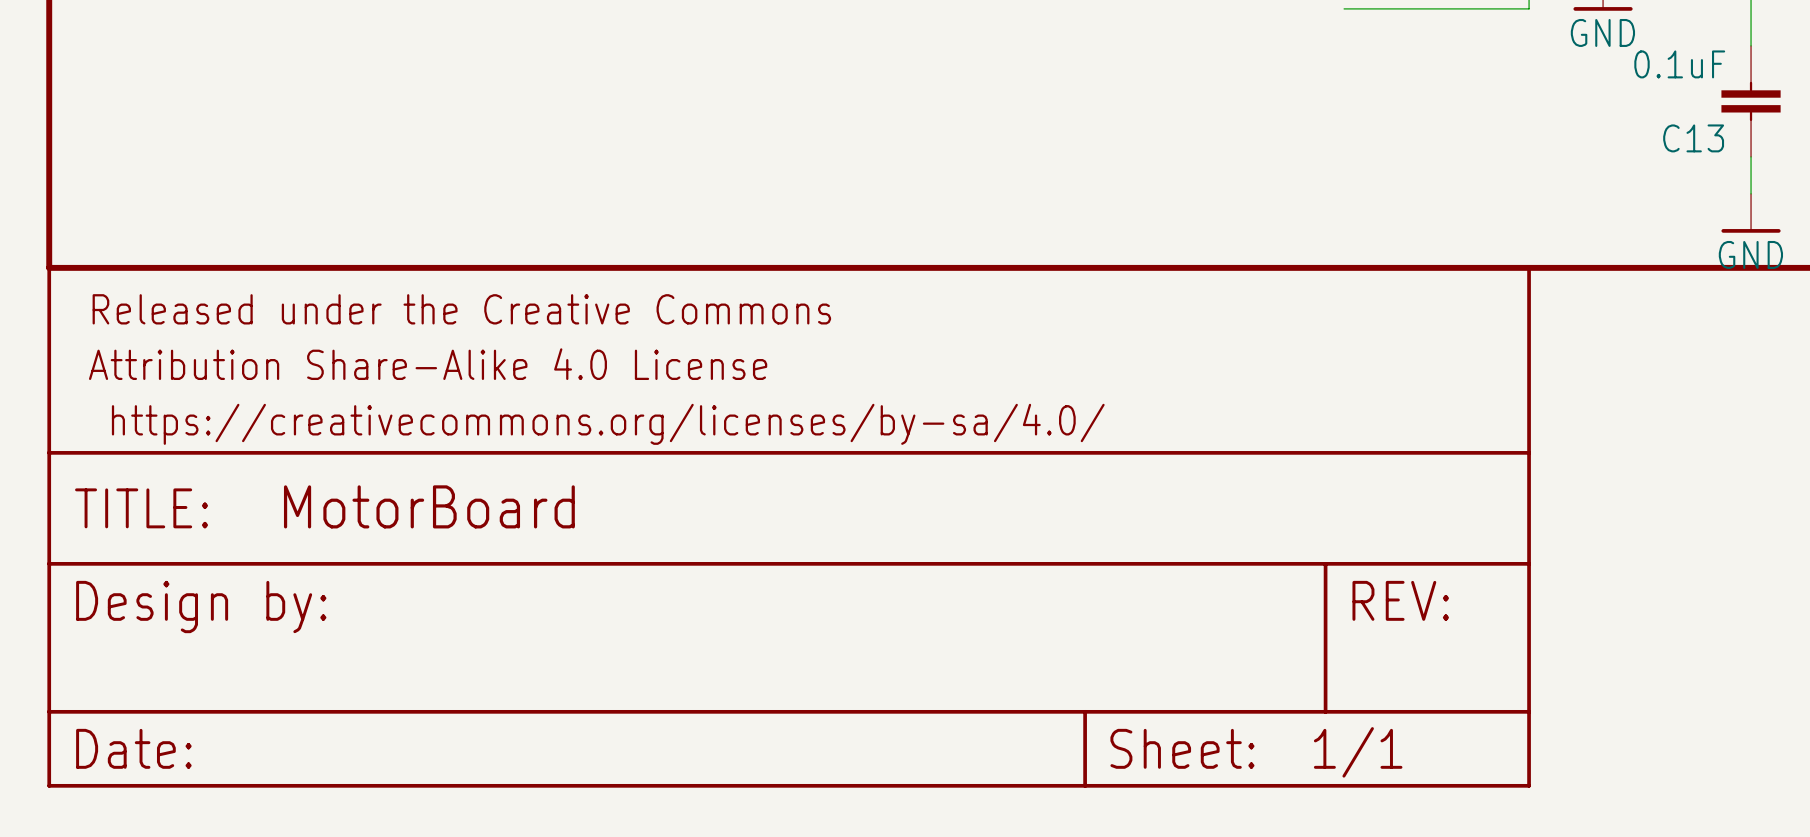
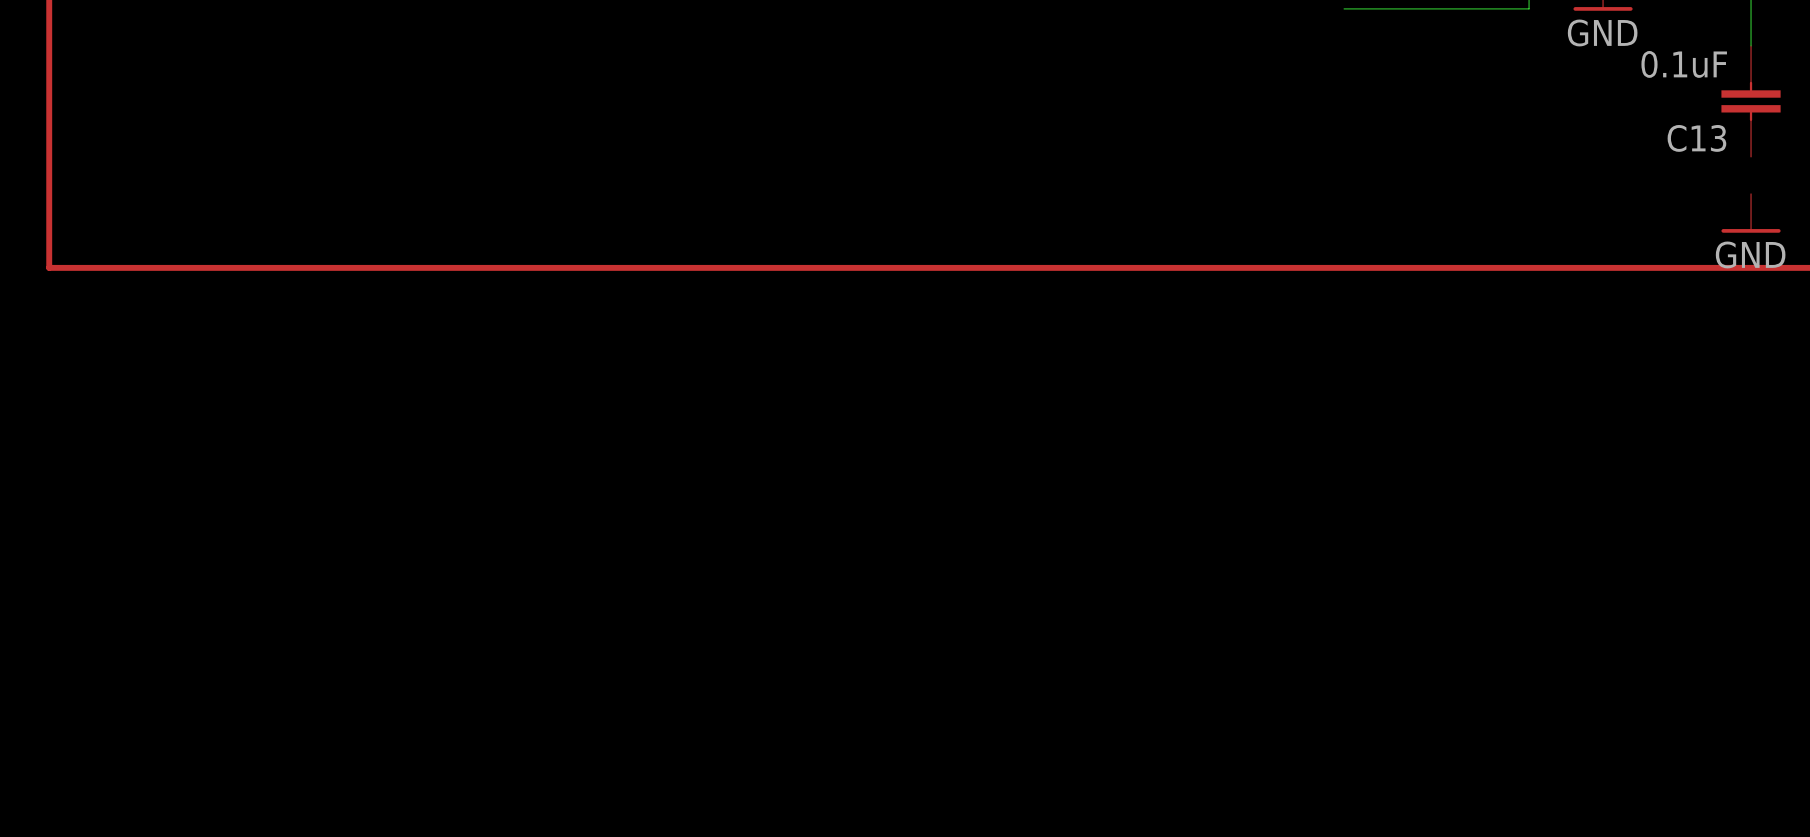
wire: (1751, 156) (1751, 193) -> none
part: (789, 526) -> none

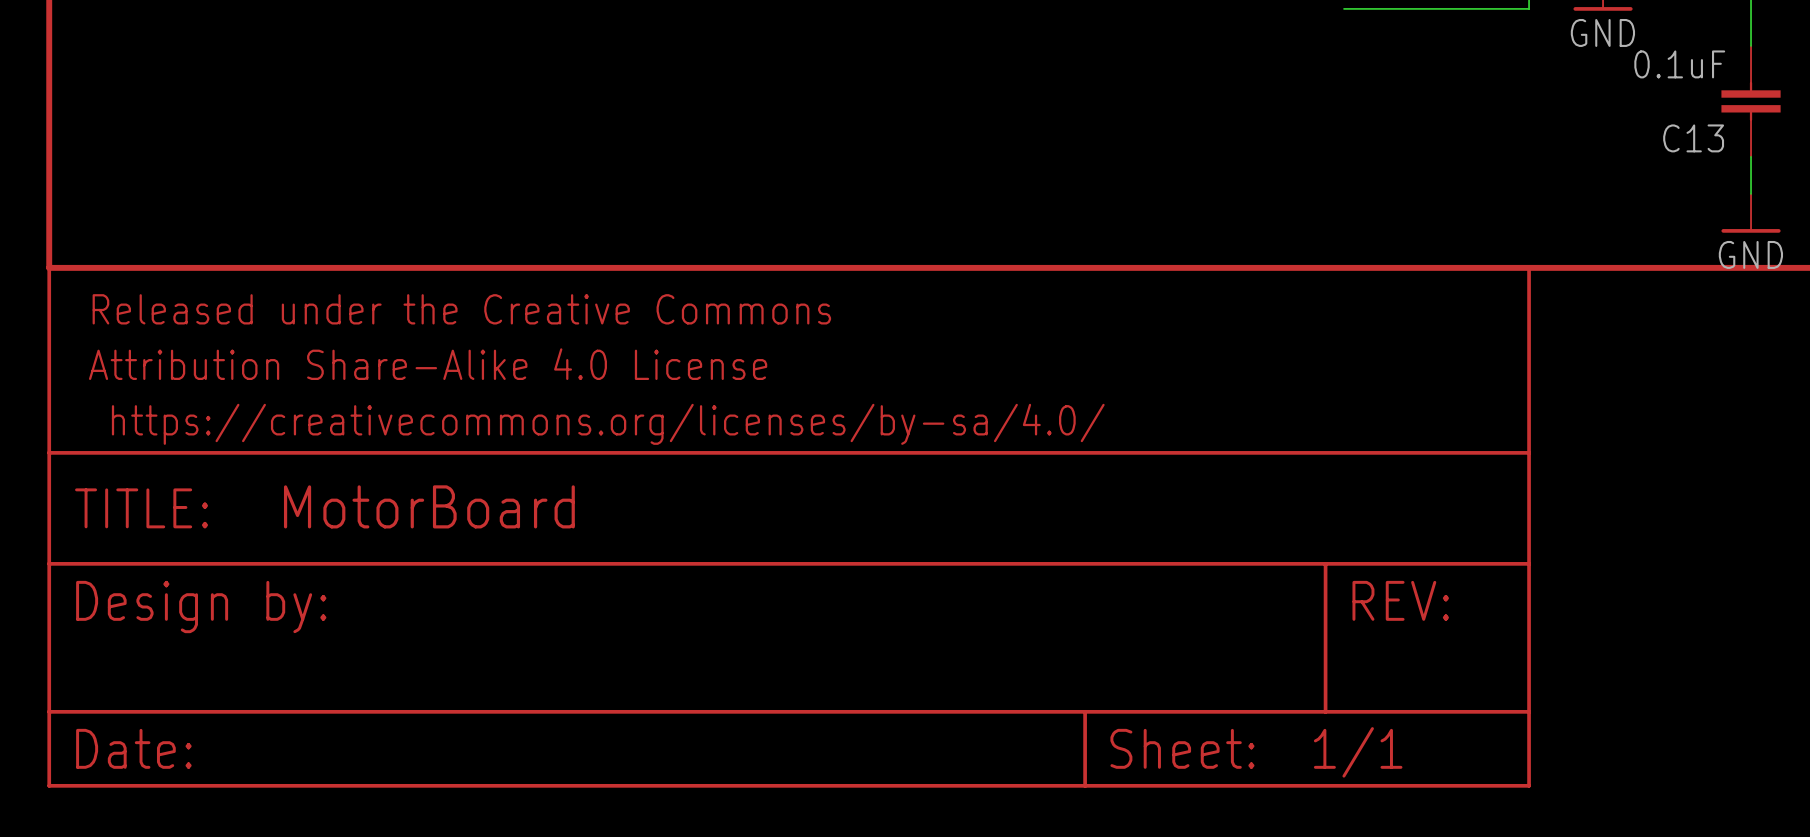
wire: none -> (1751, 156) (1751, 193)
part: none -> (789, 526)

